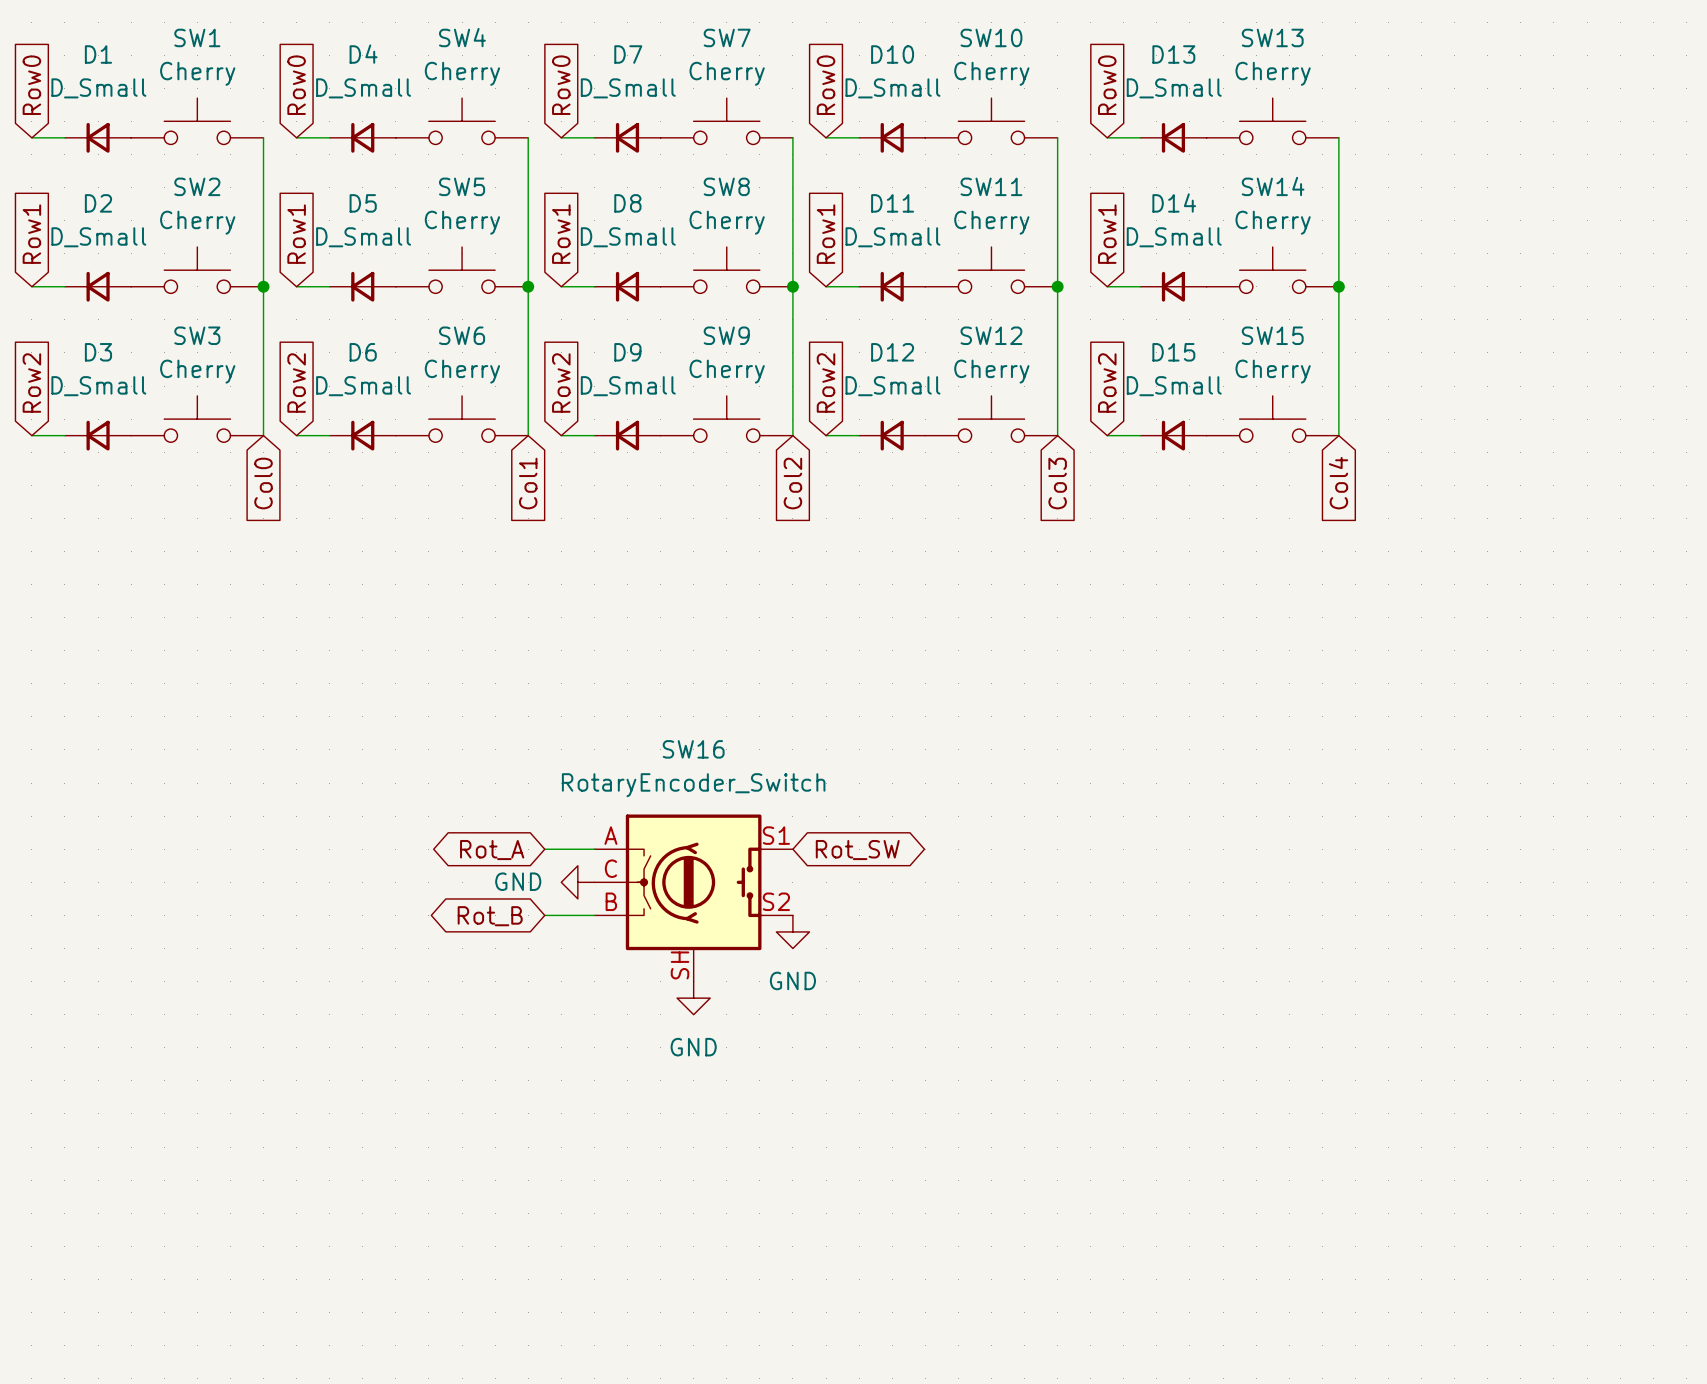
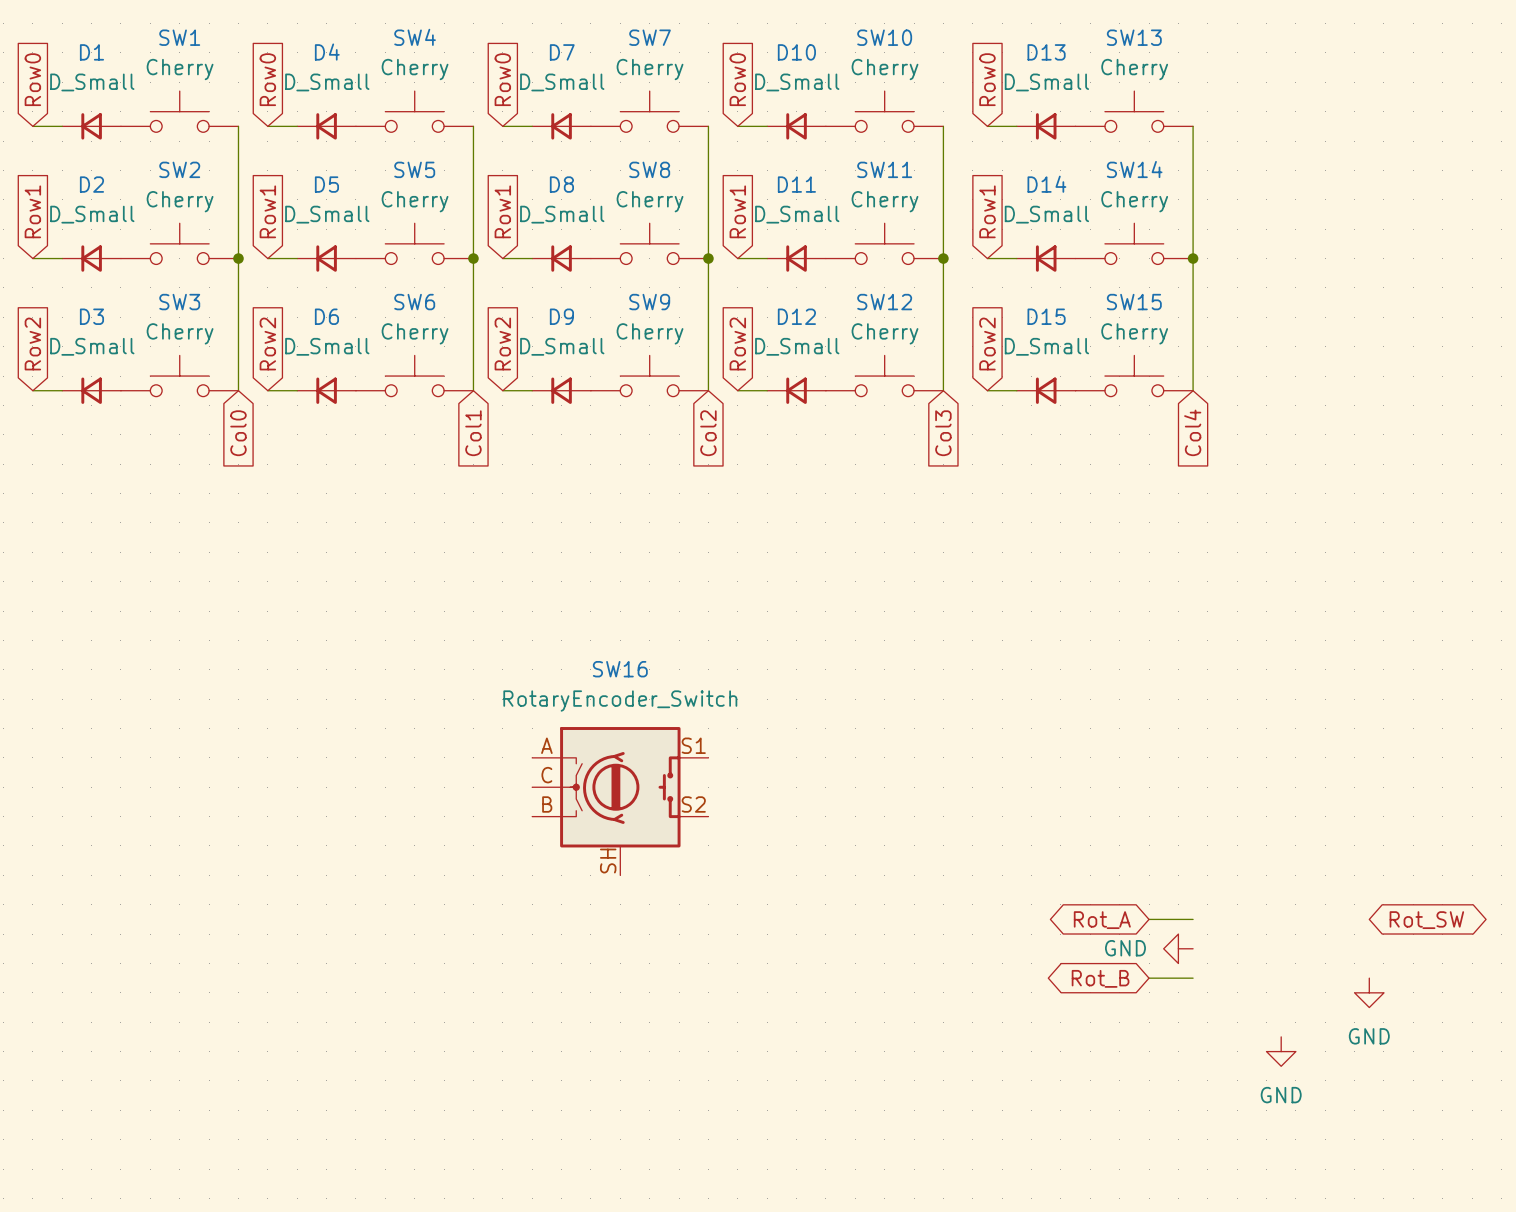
wire: (544, 849) (594, 849) -> none
global label: Rot_A (492, 850) -> none
global label: Rot_SW (857, 850) -> none
power symbol: GND (577, 882) -> none
wire: (544, 915) (594, 915) -> none
global label: Rot_B (490, 916) -> none
power symbol: GND (792, 931) -> none
power symbol: GND (693, 998) -> none
wire: none -> (1149, 919) (1193, 919)
global label: none -> Rot_A (1102, 920)
global label: none -> Rot_SW (1426, 920)
power symbol: none -> GND (1178, 948)
wire: none -> (1149, 978) (1193, 978)
global label: none -> Rot_B (1100, 978)
power symbol: none -> GND (1369, 992)
power symbol: none -> GND (1281, 1051)

